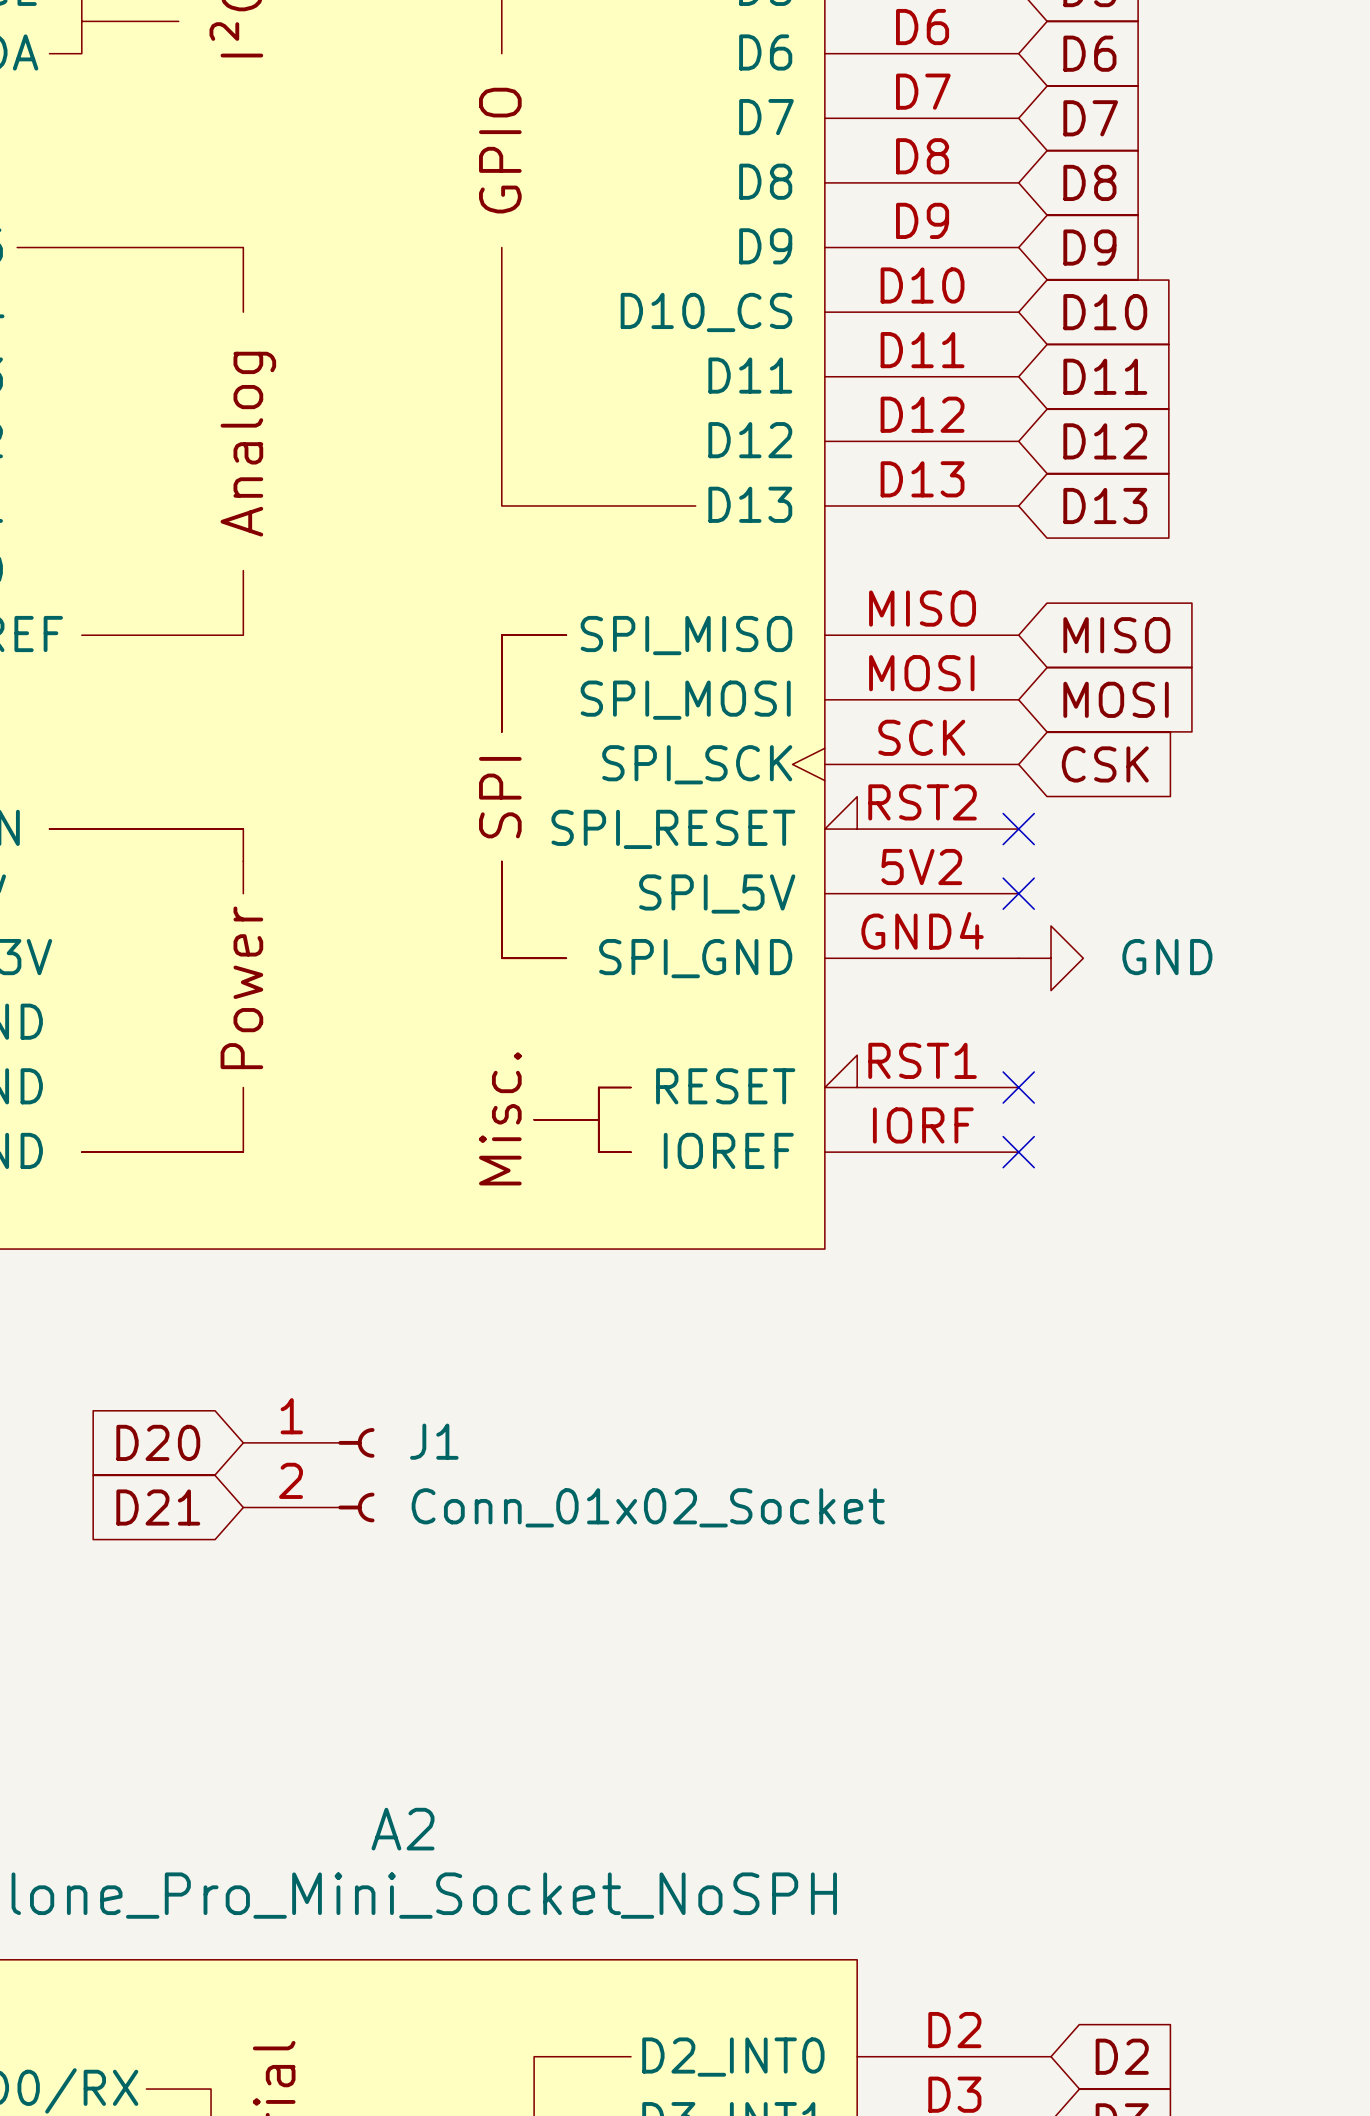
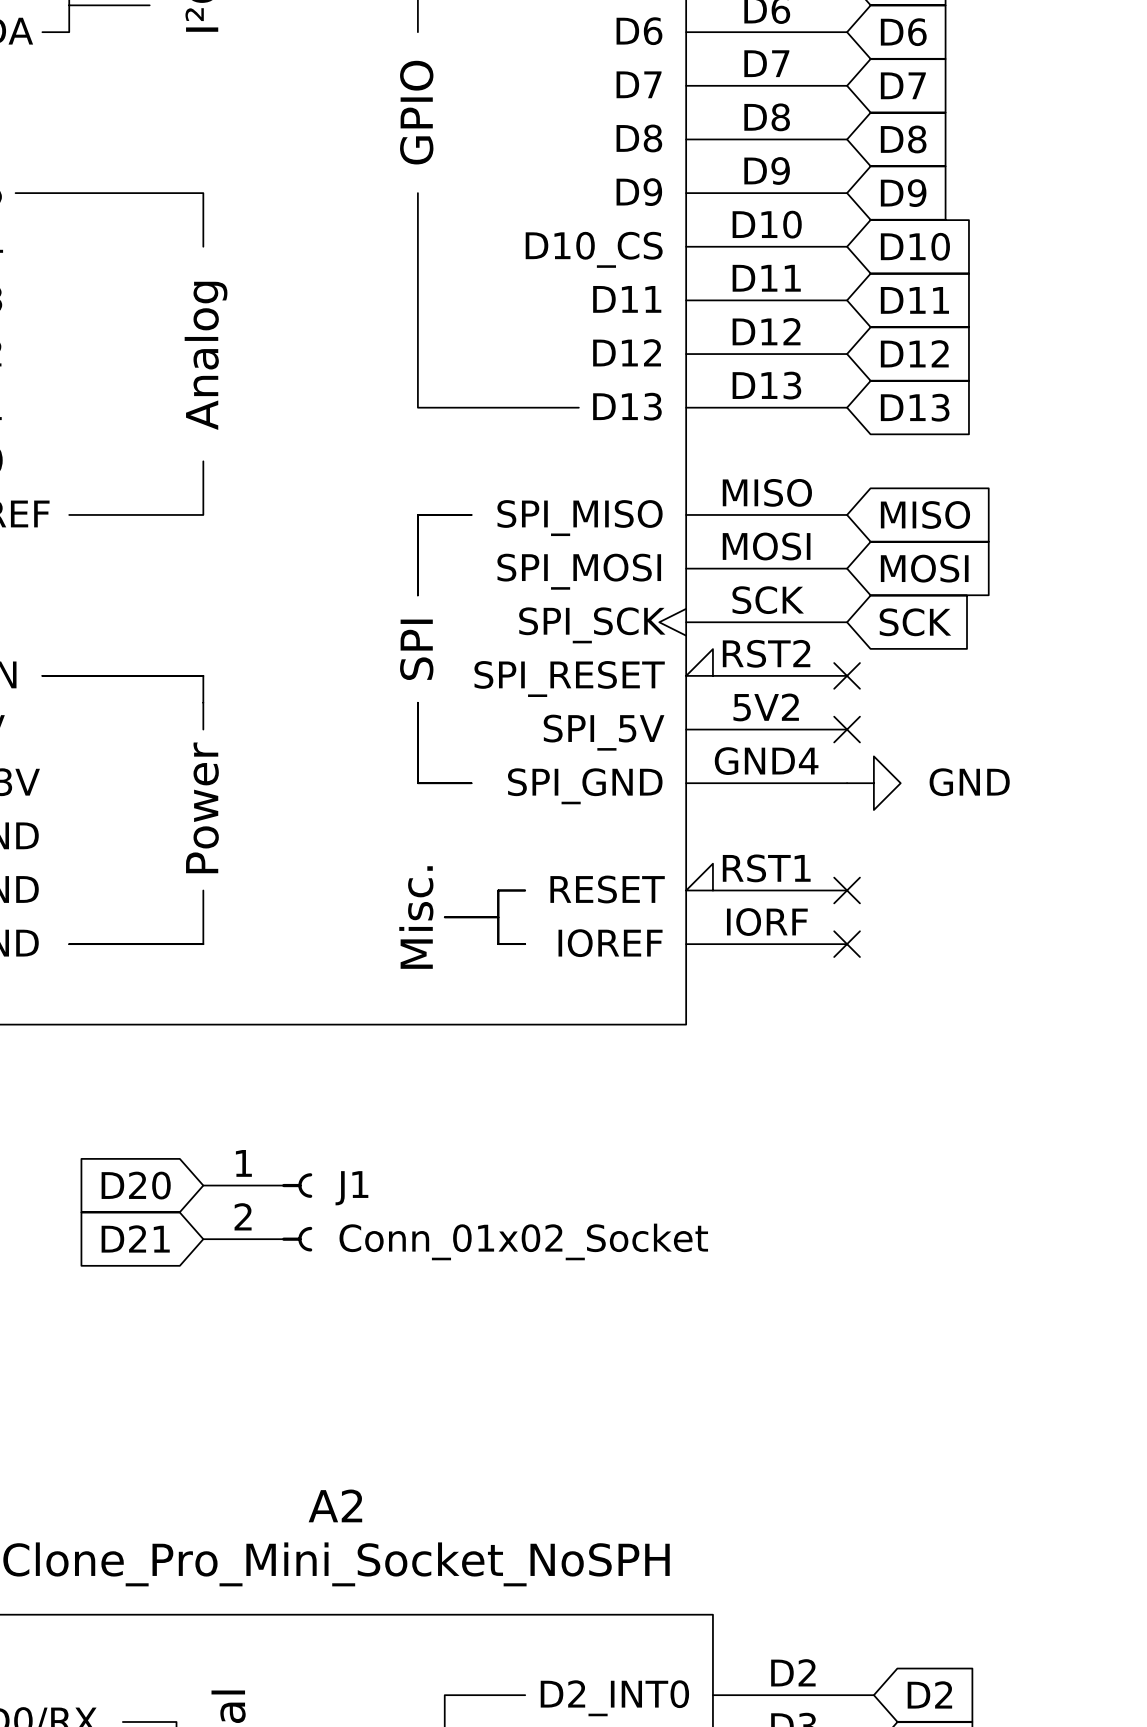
global label: CSK (1105, 764) -> SCK (915, 622)

